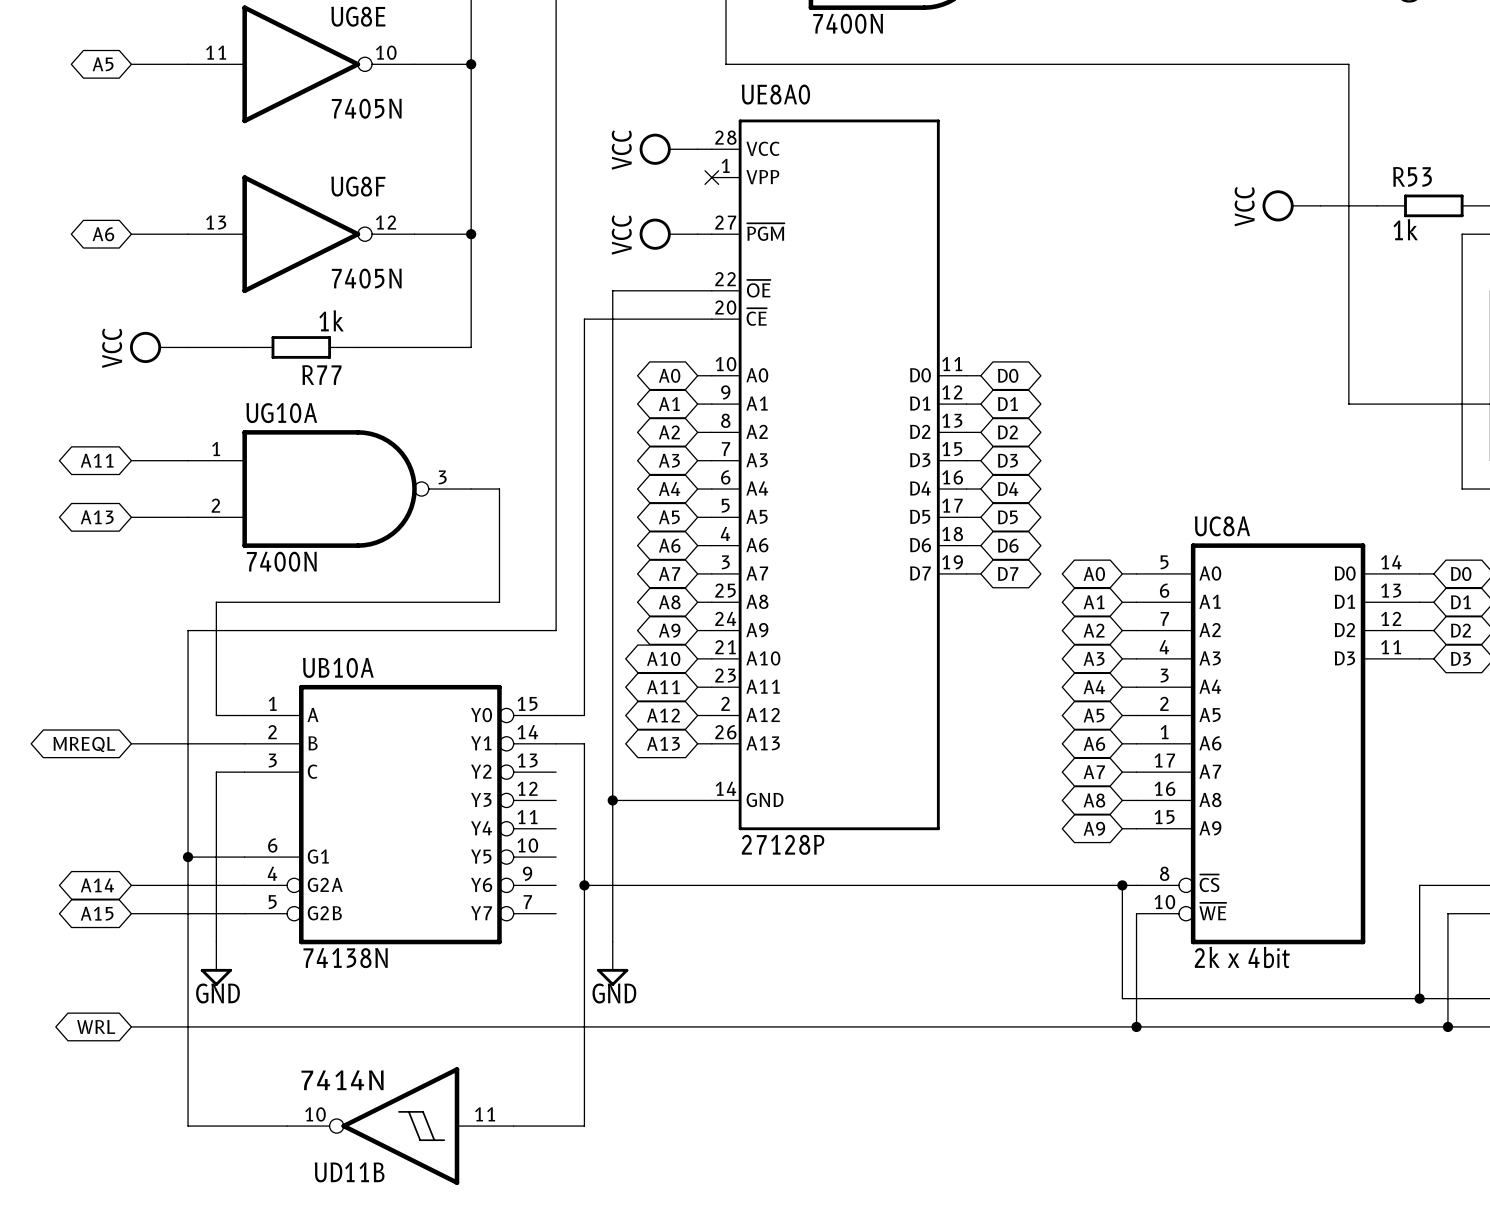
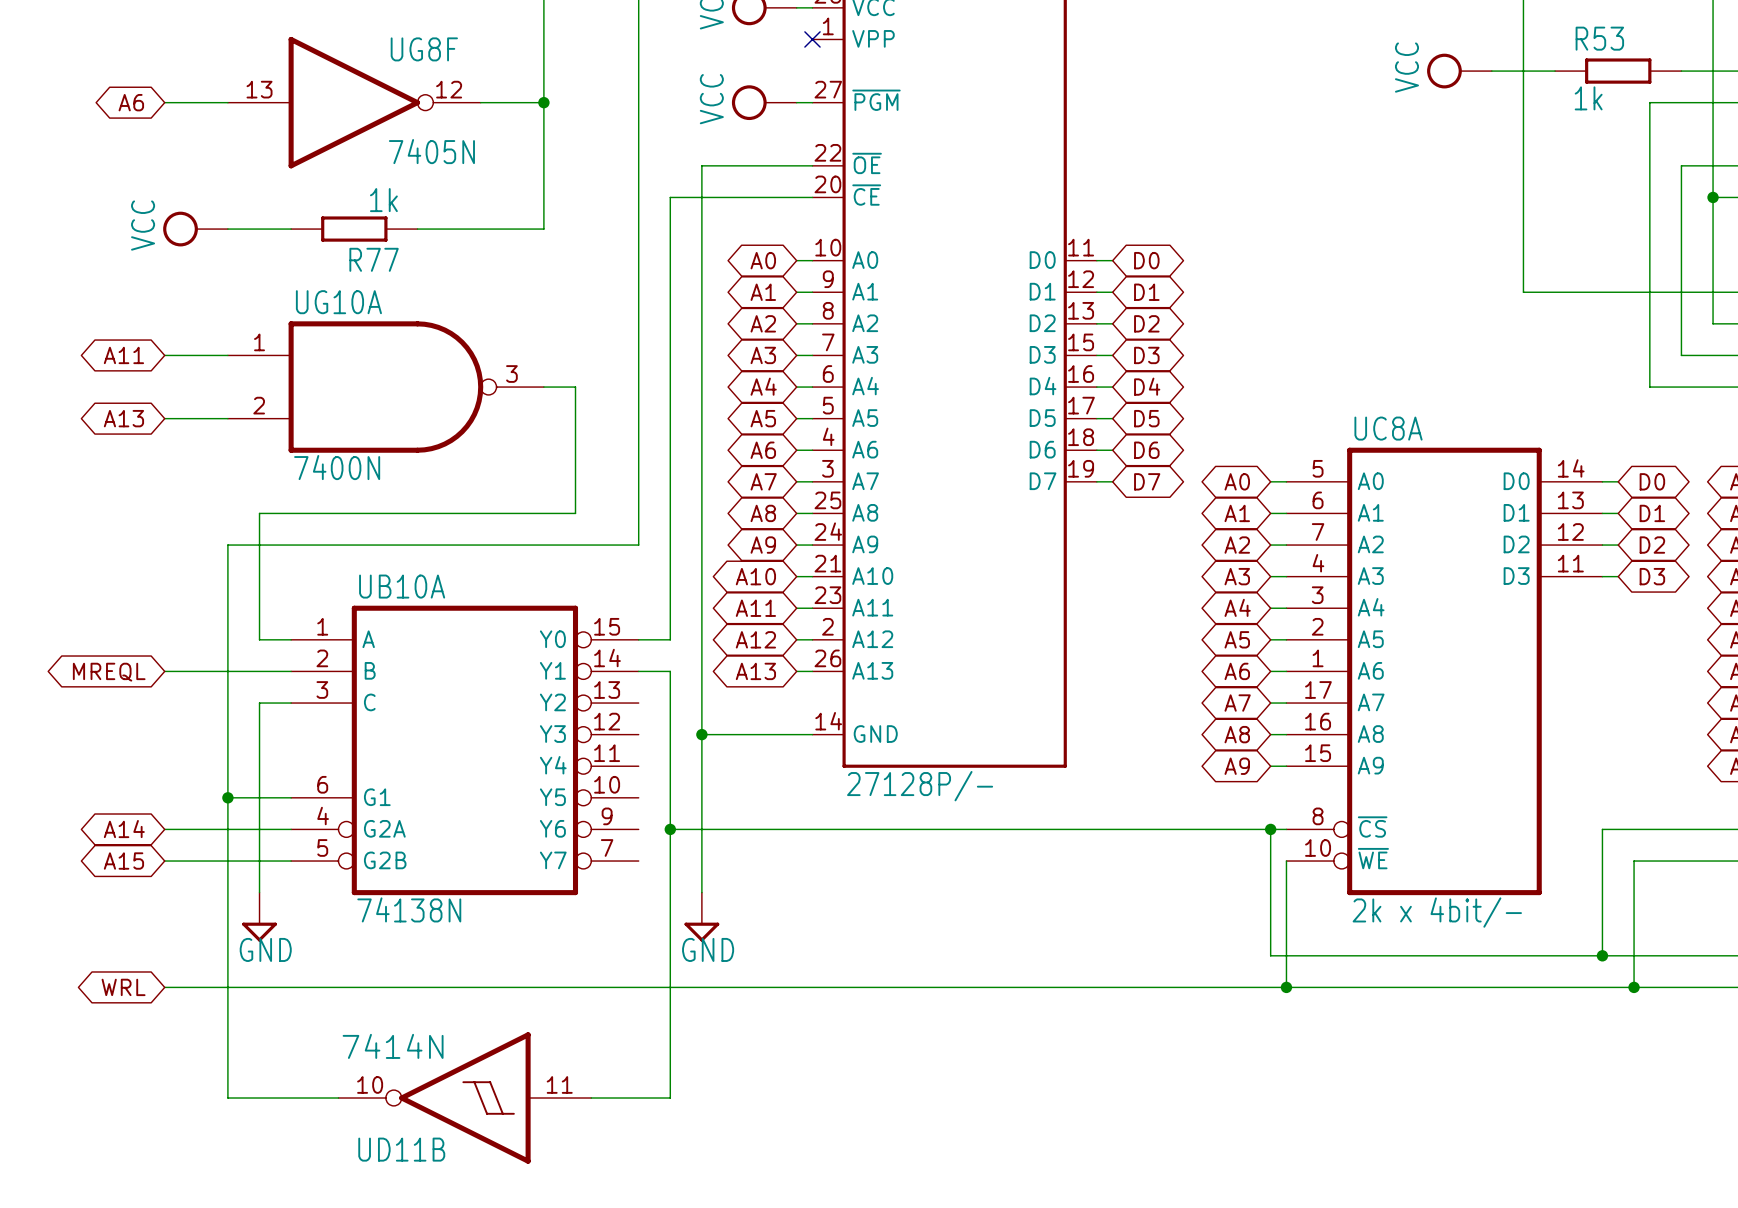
UE8A0 value: 27128P (783, 844) -> 27128P/- (920, 786)
UC8A value: 2k x 4bit (1242, 957) -> 2k x 4bit/- (1437, 912)

